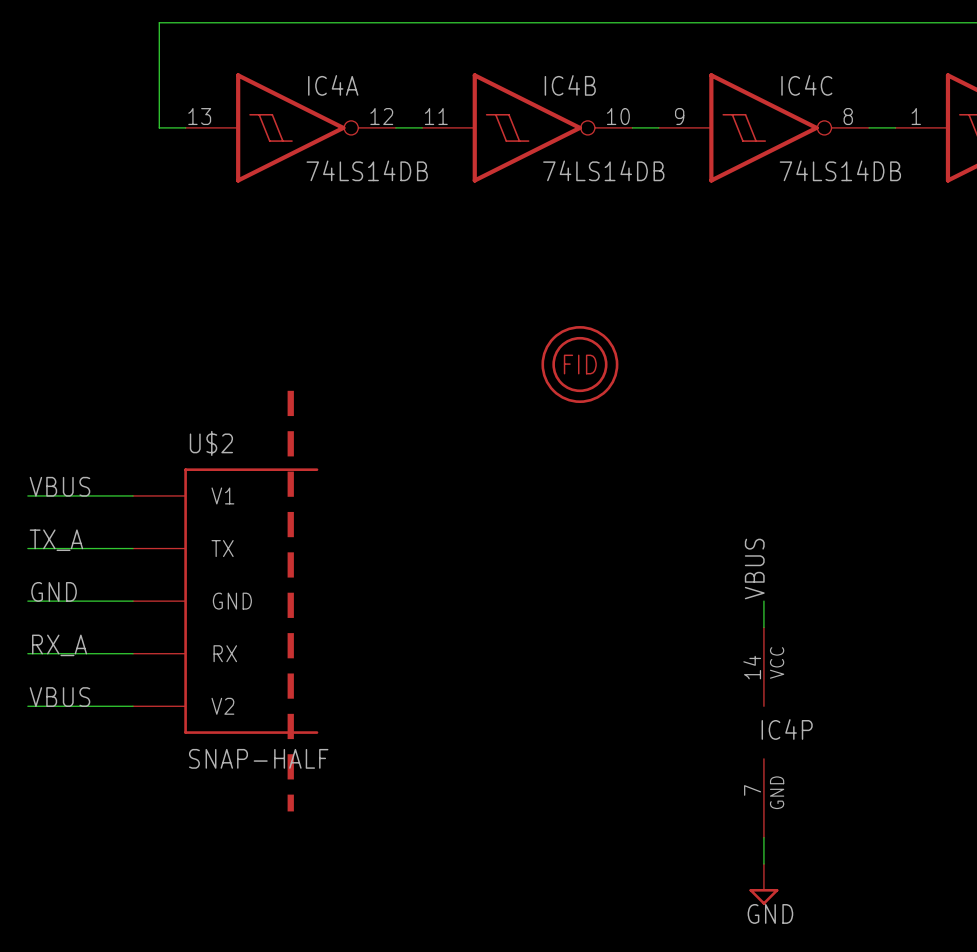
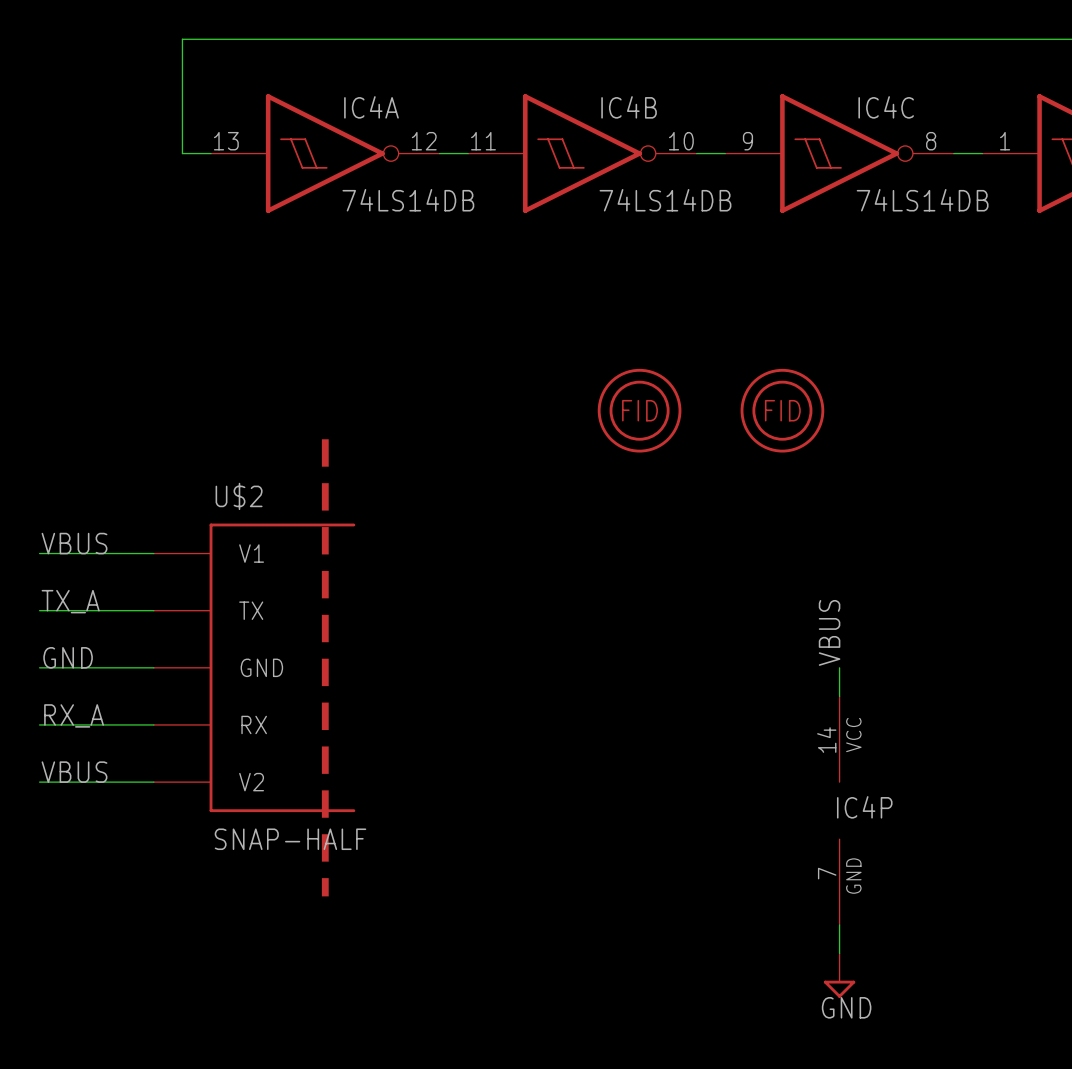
part: none -> (782, 410)

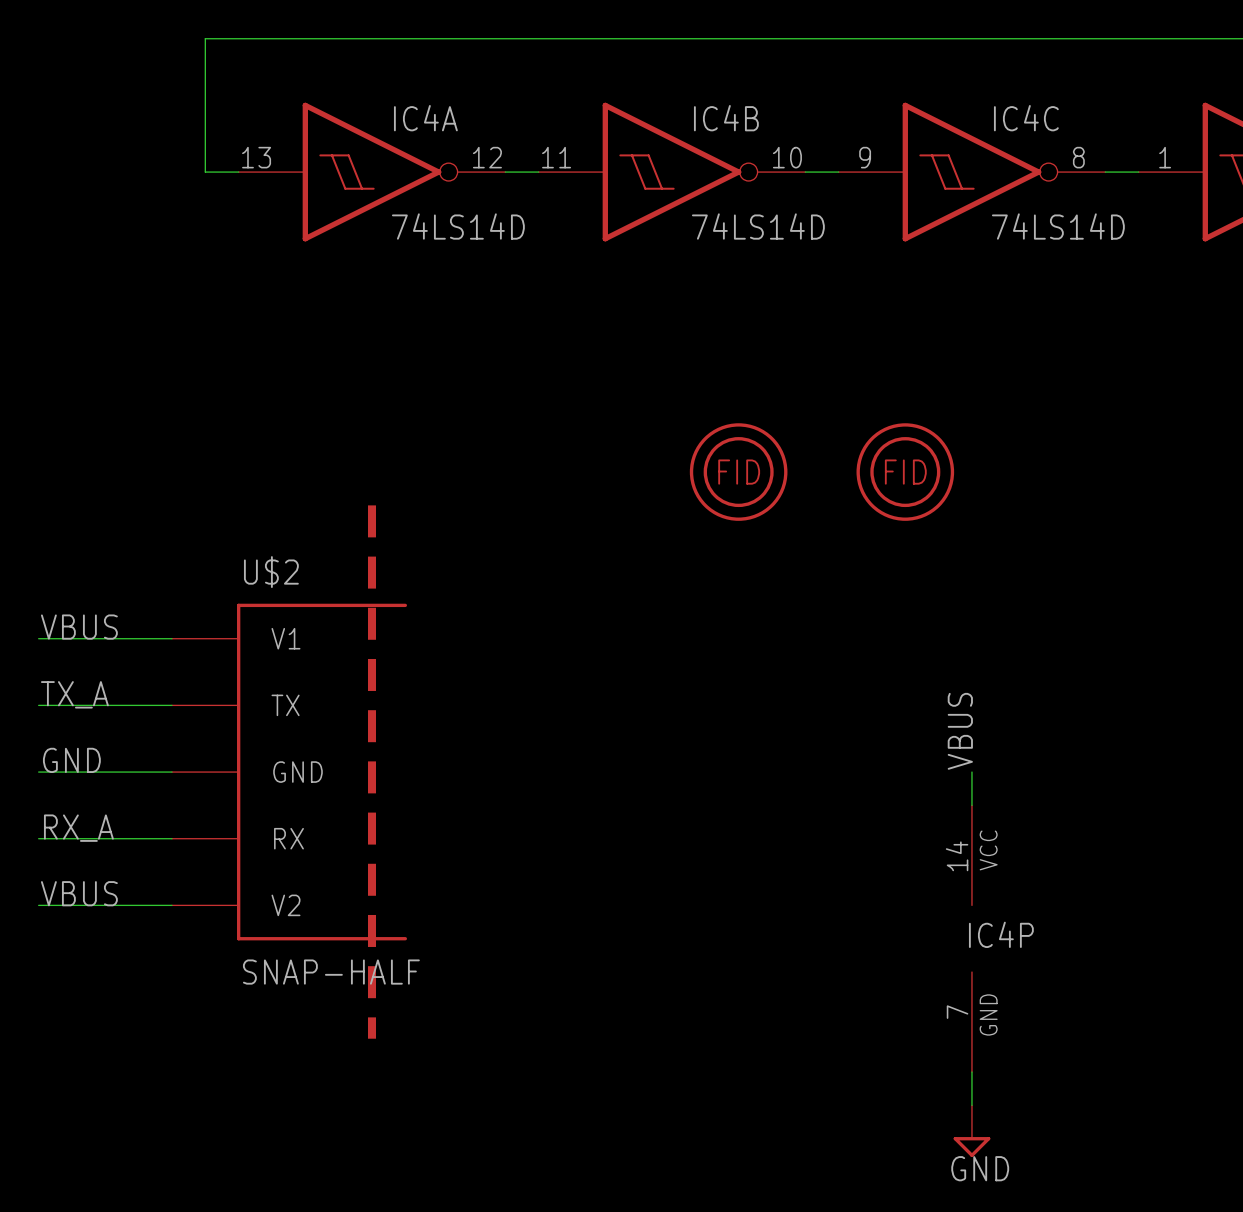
IC4A value: 74LS14DB (408, 200) -> 74LS14D (458, 226)
IC4B value: 74LS14DB (665, 200) -> 74LS14D (758, 226)
IC4C value: 74LS14DB (922, 200) -> 74LS14D (1058, 226)

